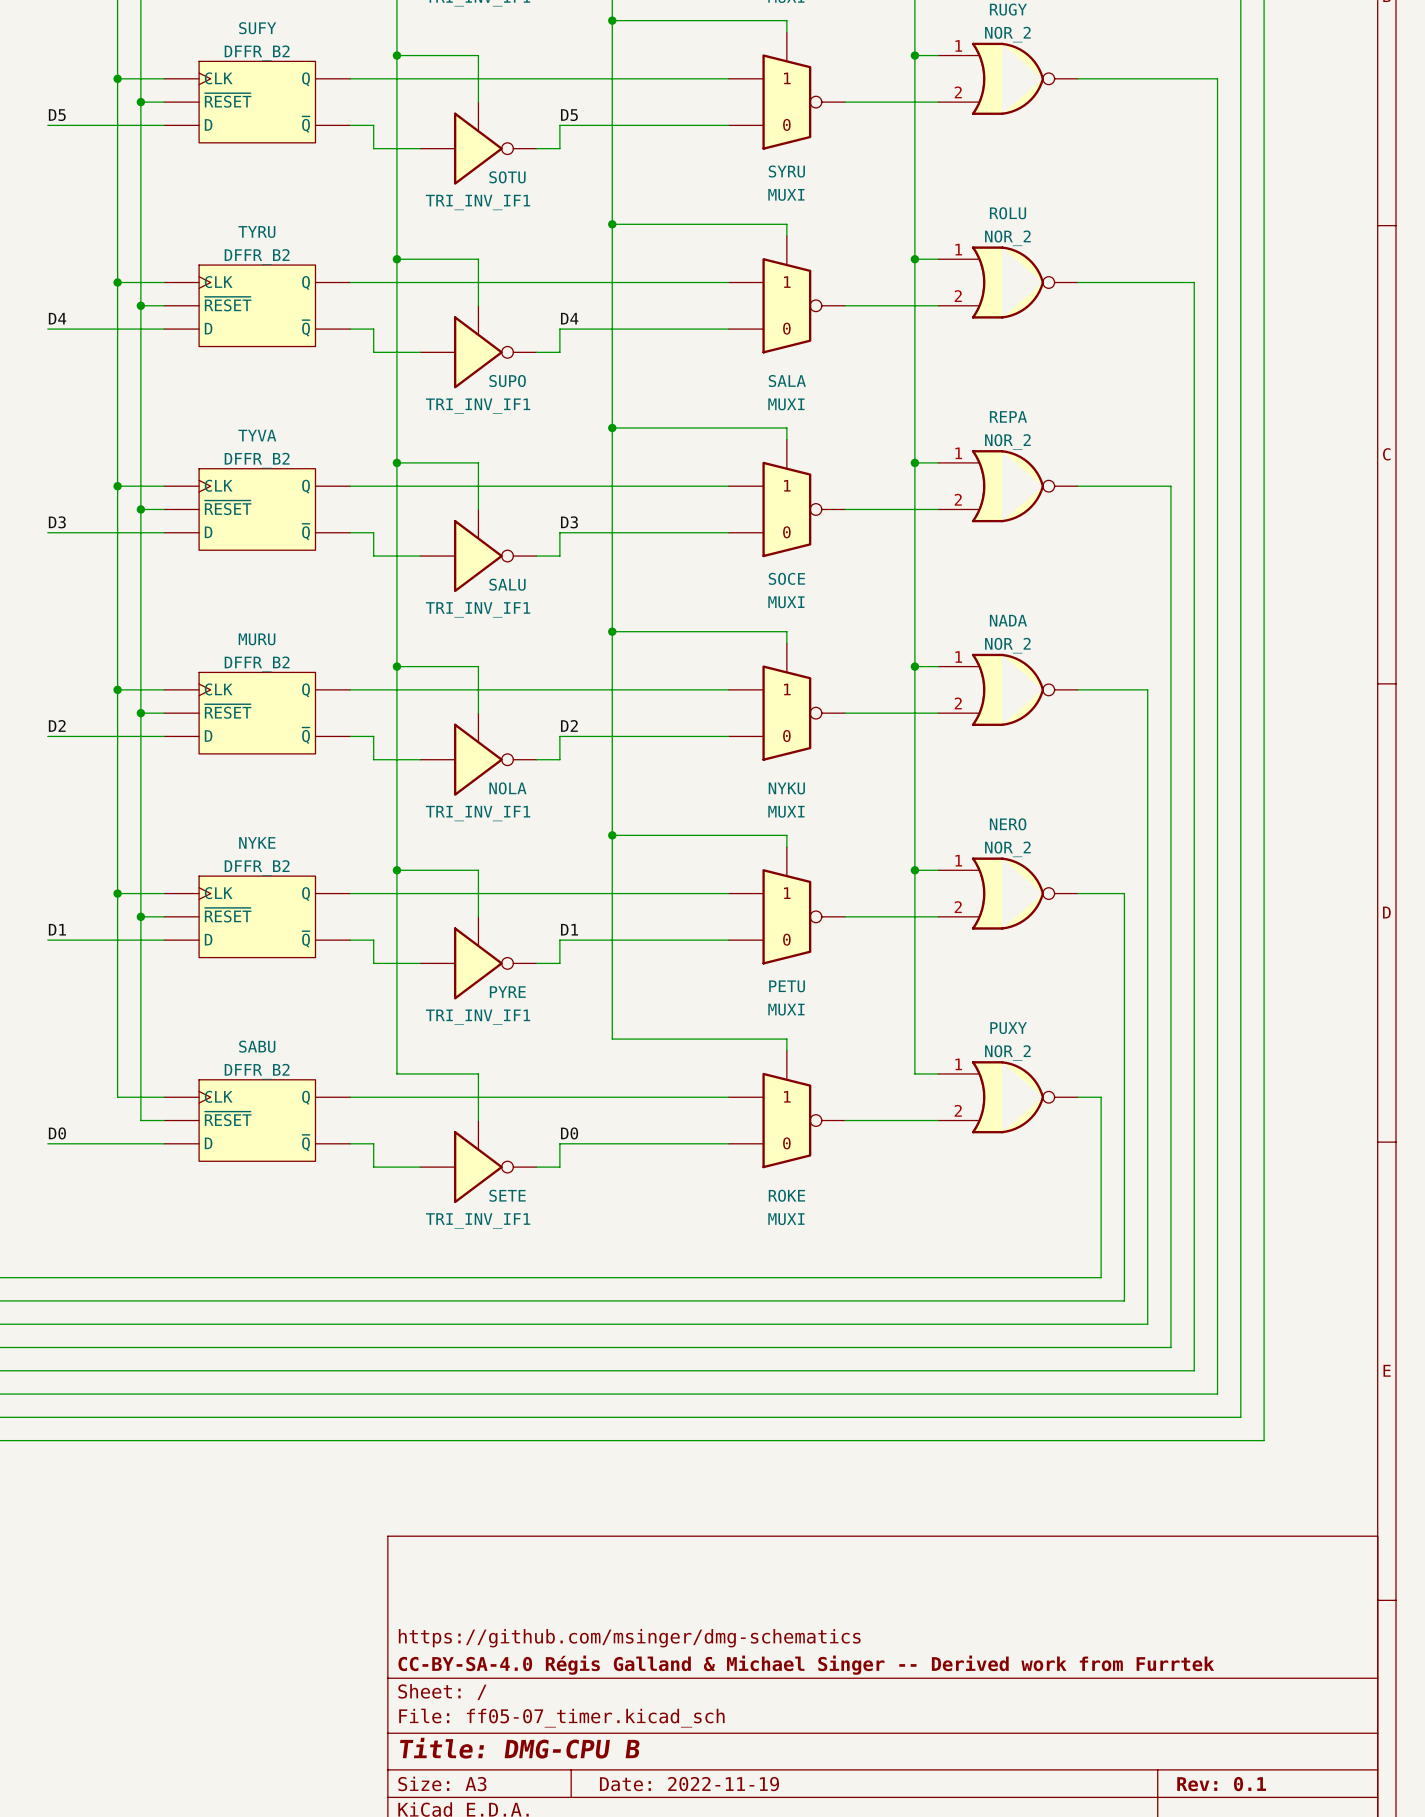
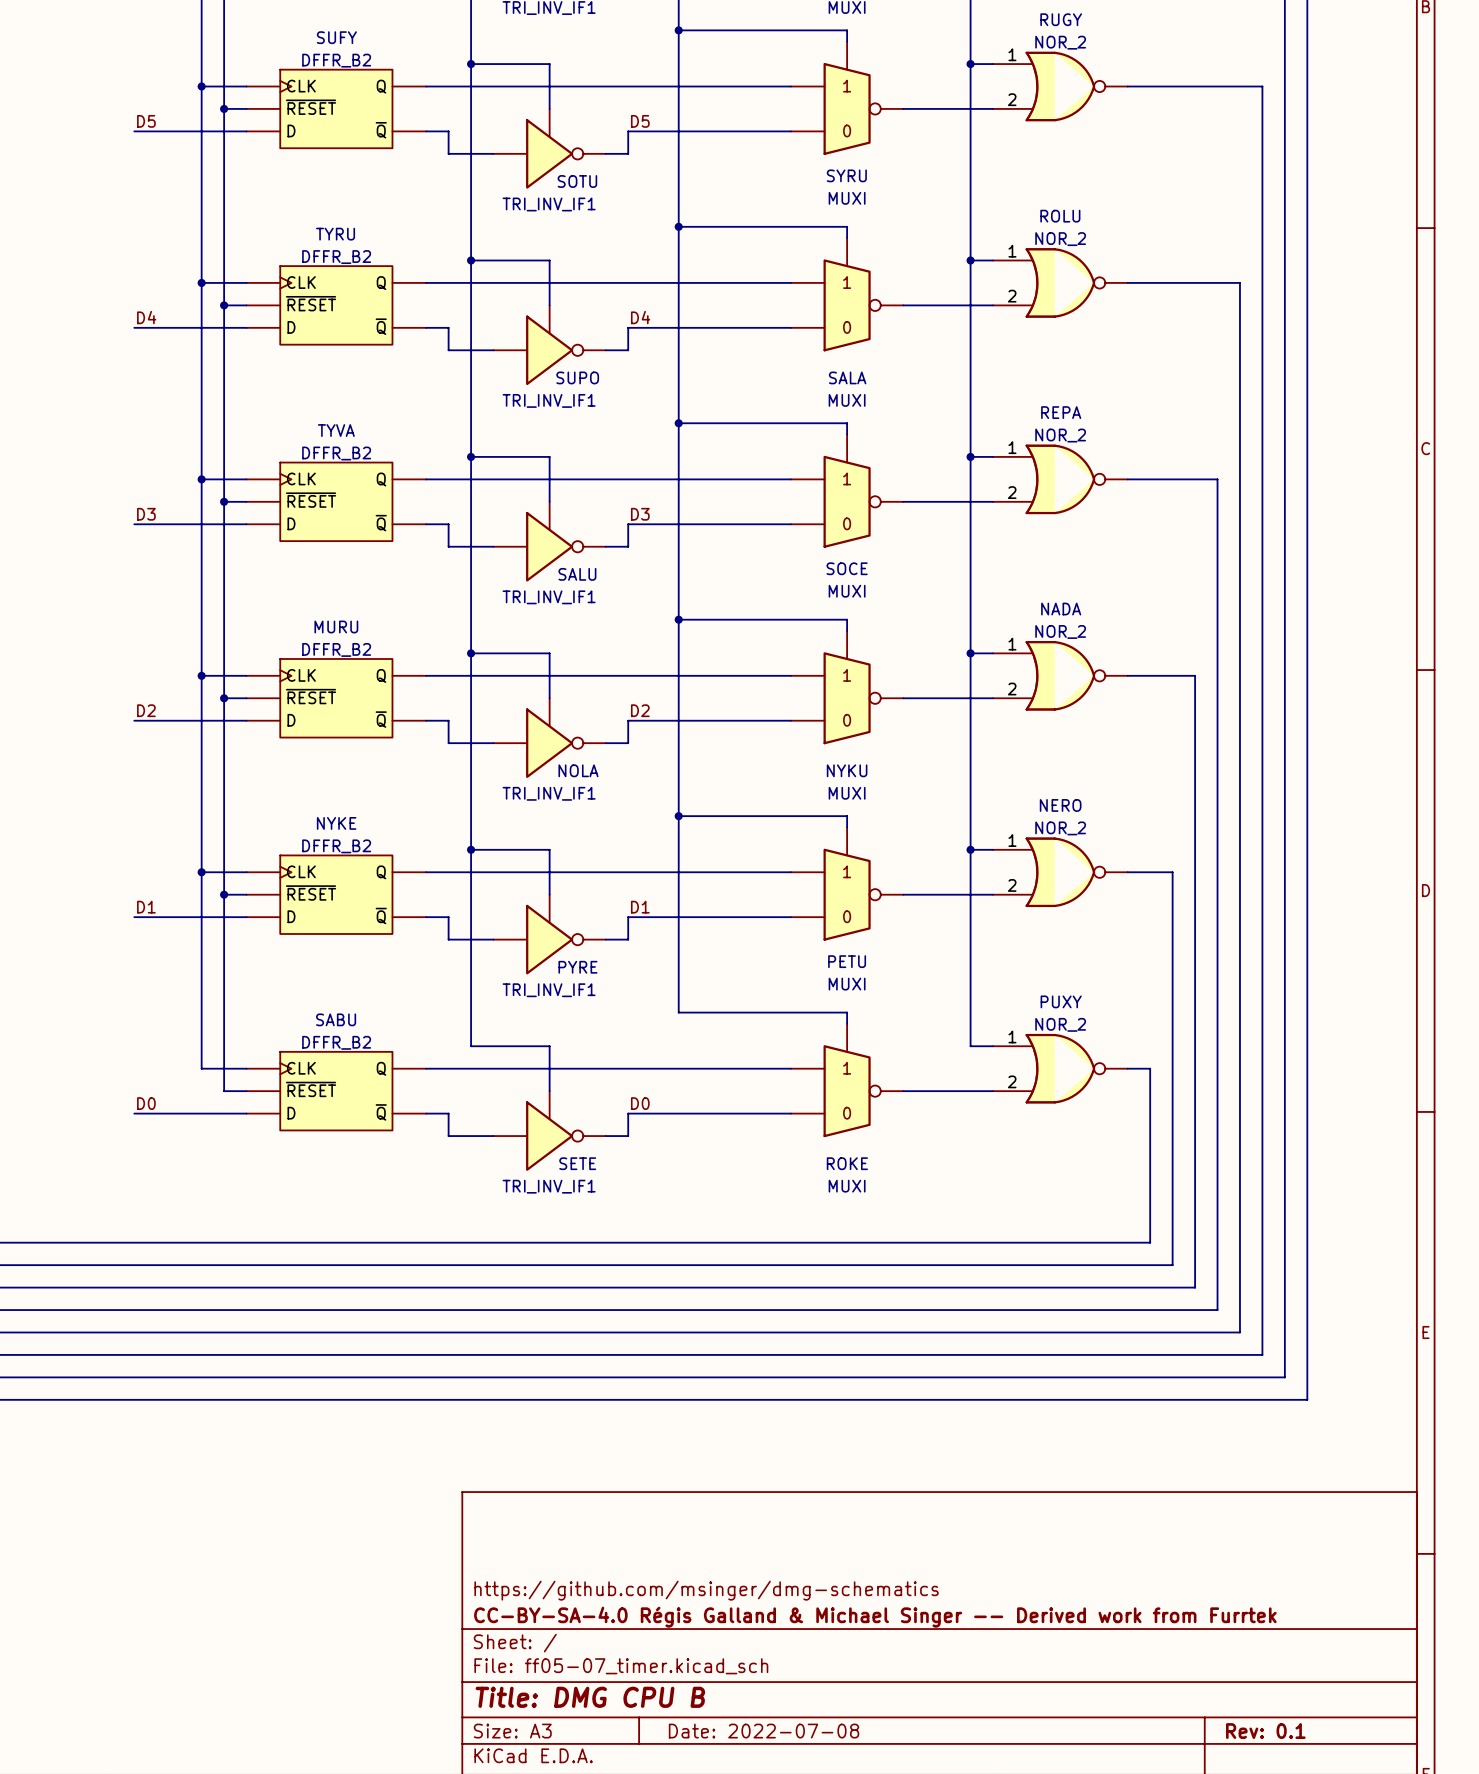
title block: Title: DMG-CPU B (519, 1748) -> Title: DMG CPU B (590, 1697)
title block: Date: 2022-11-19 (689, 1784) -> Date: 2022-07-08 (764, 1731)

